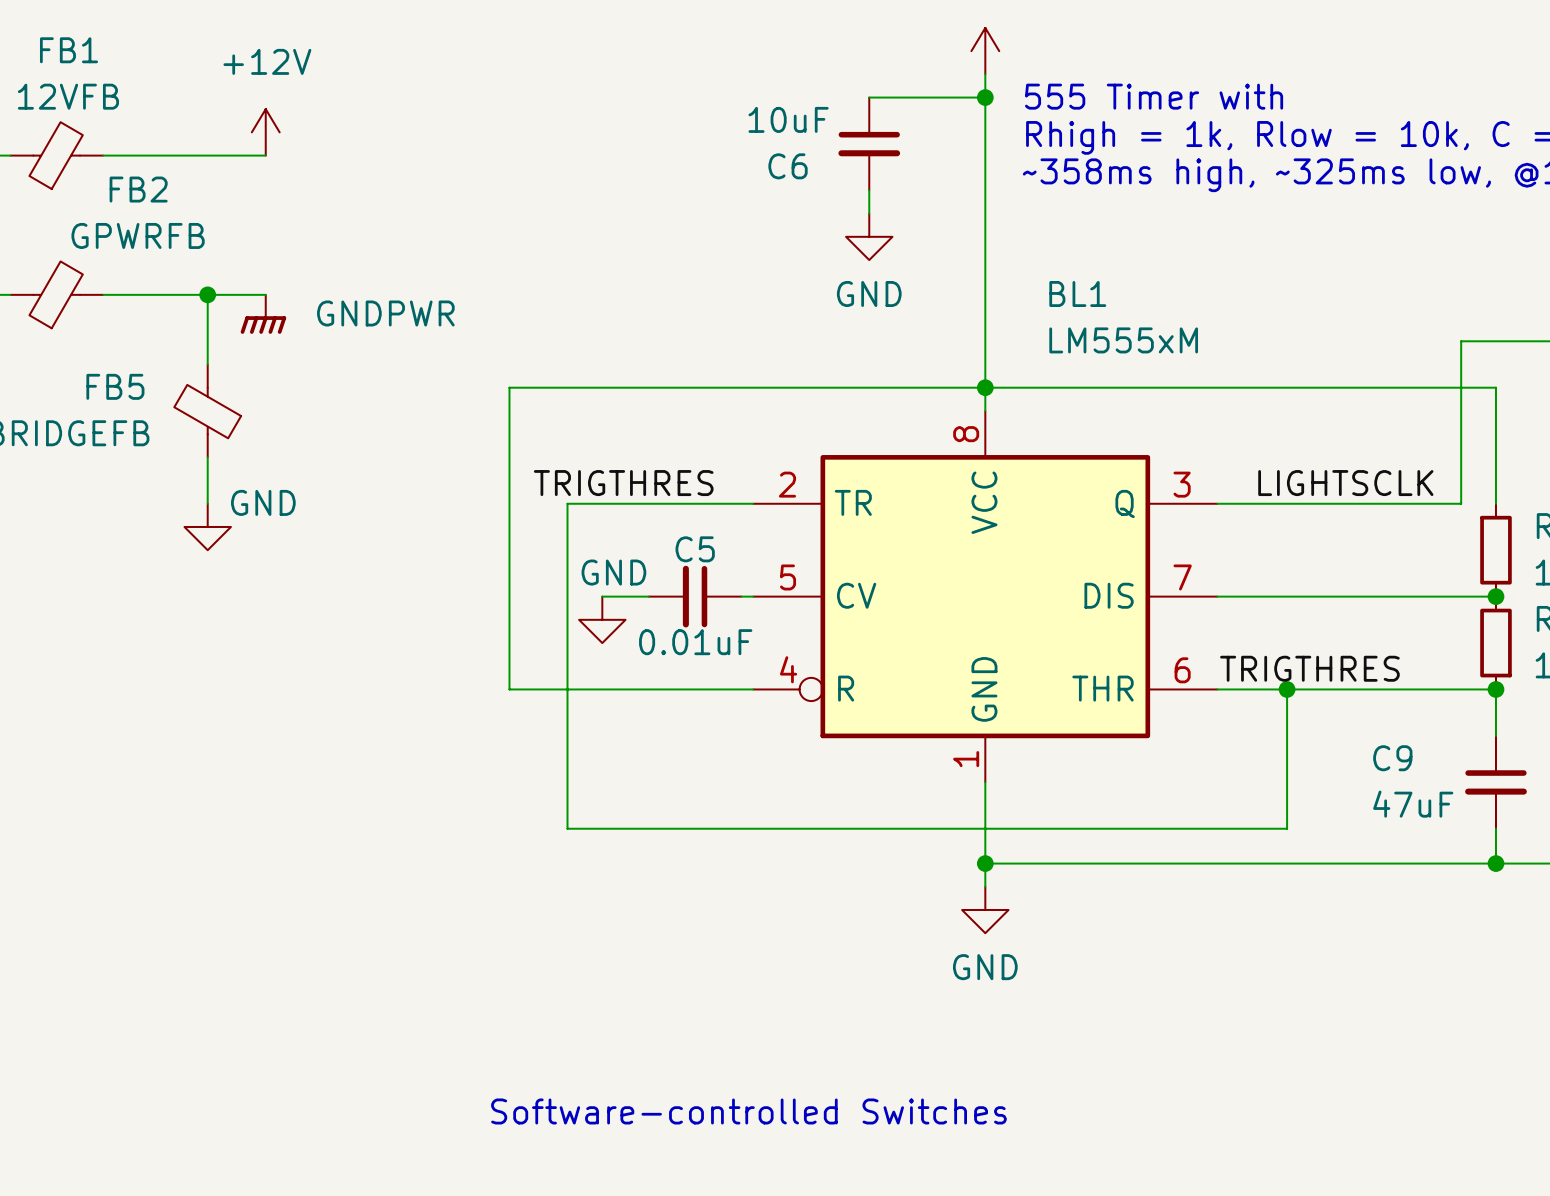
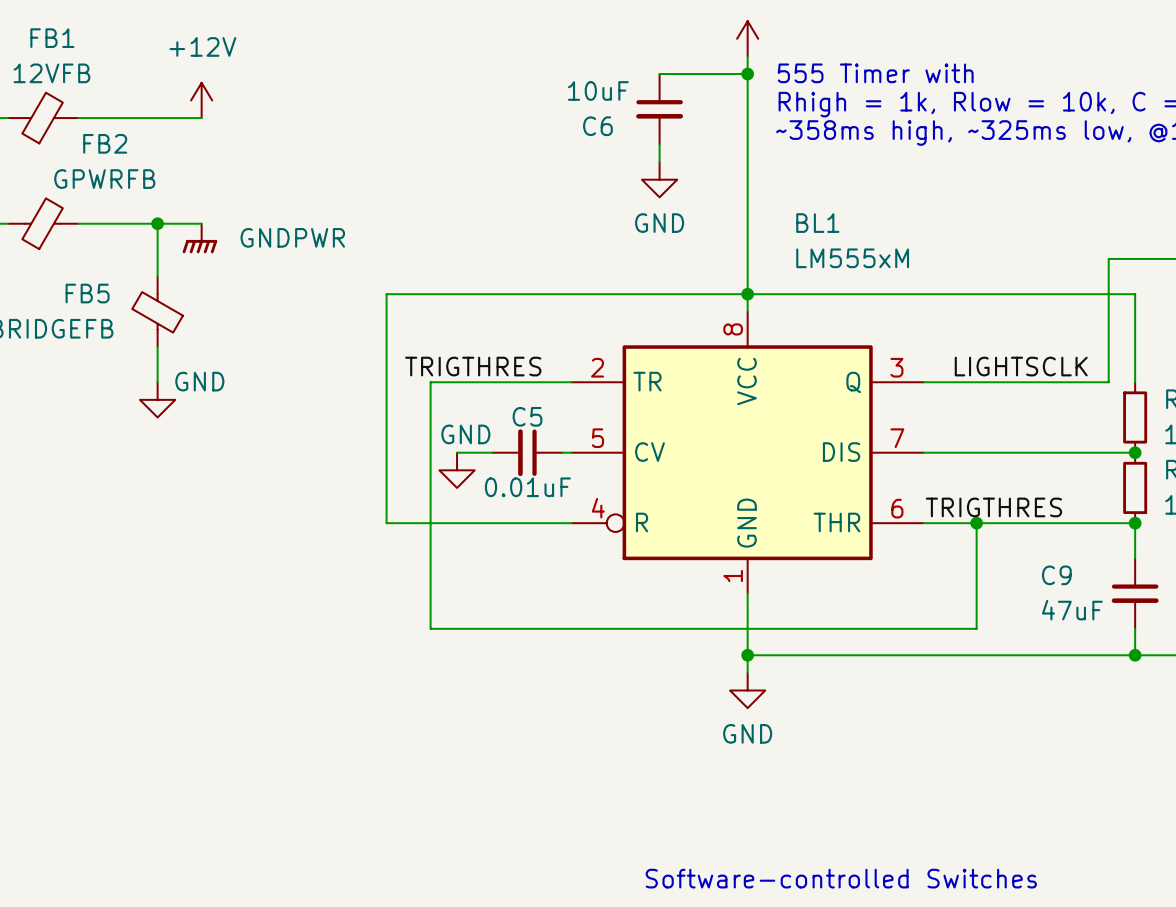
text position: Software-controlled Switches (748, 1111) -> Software-controlled Switches (841, 878)

